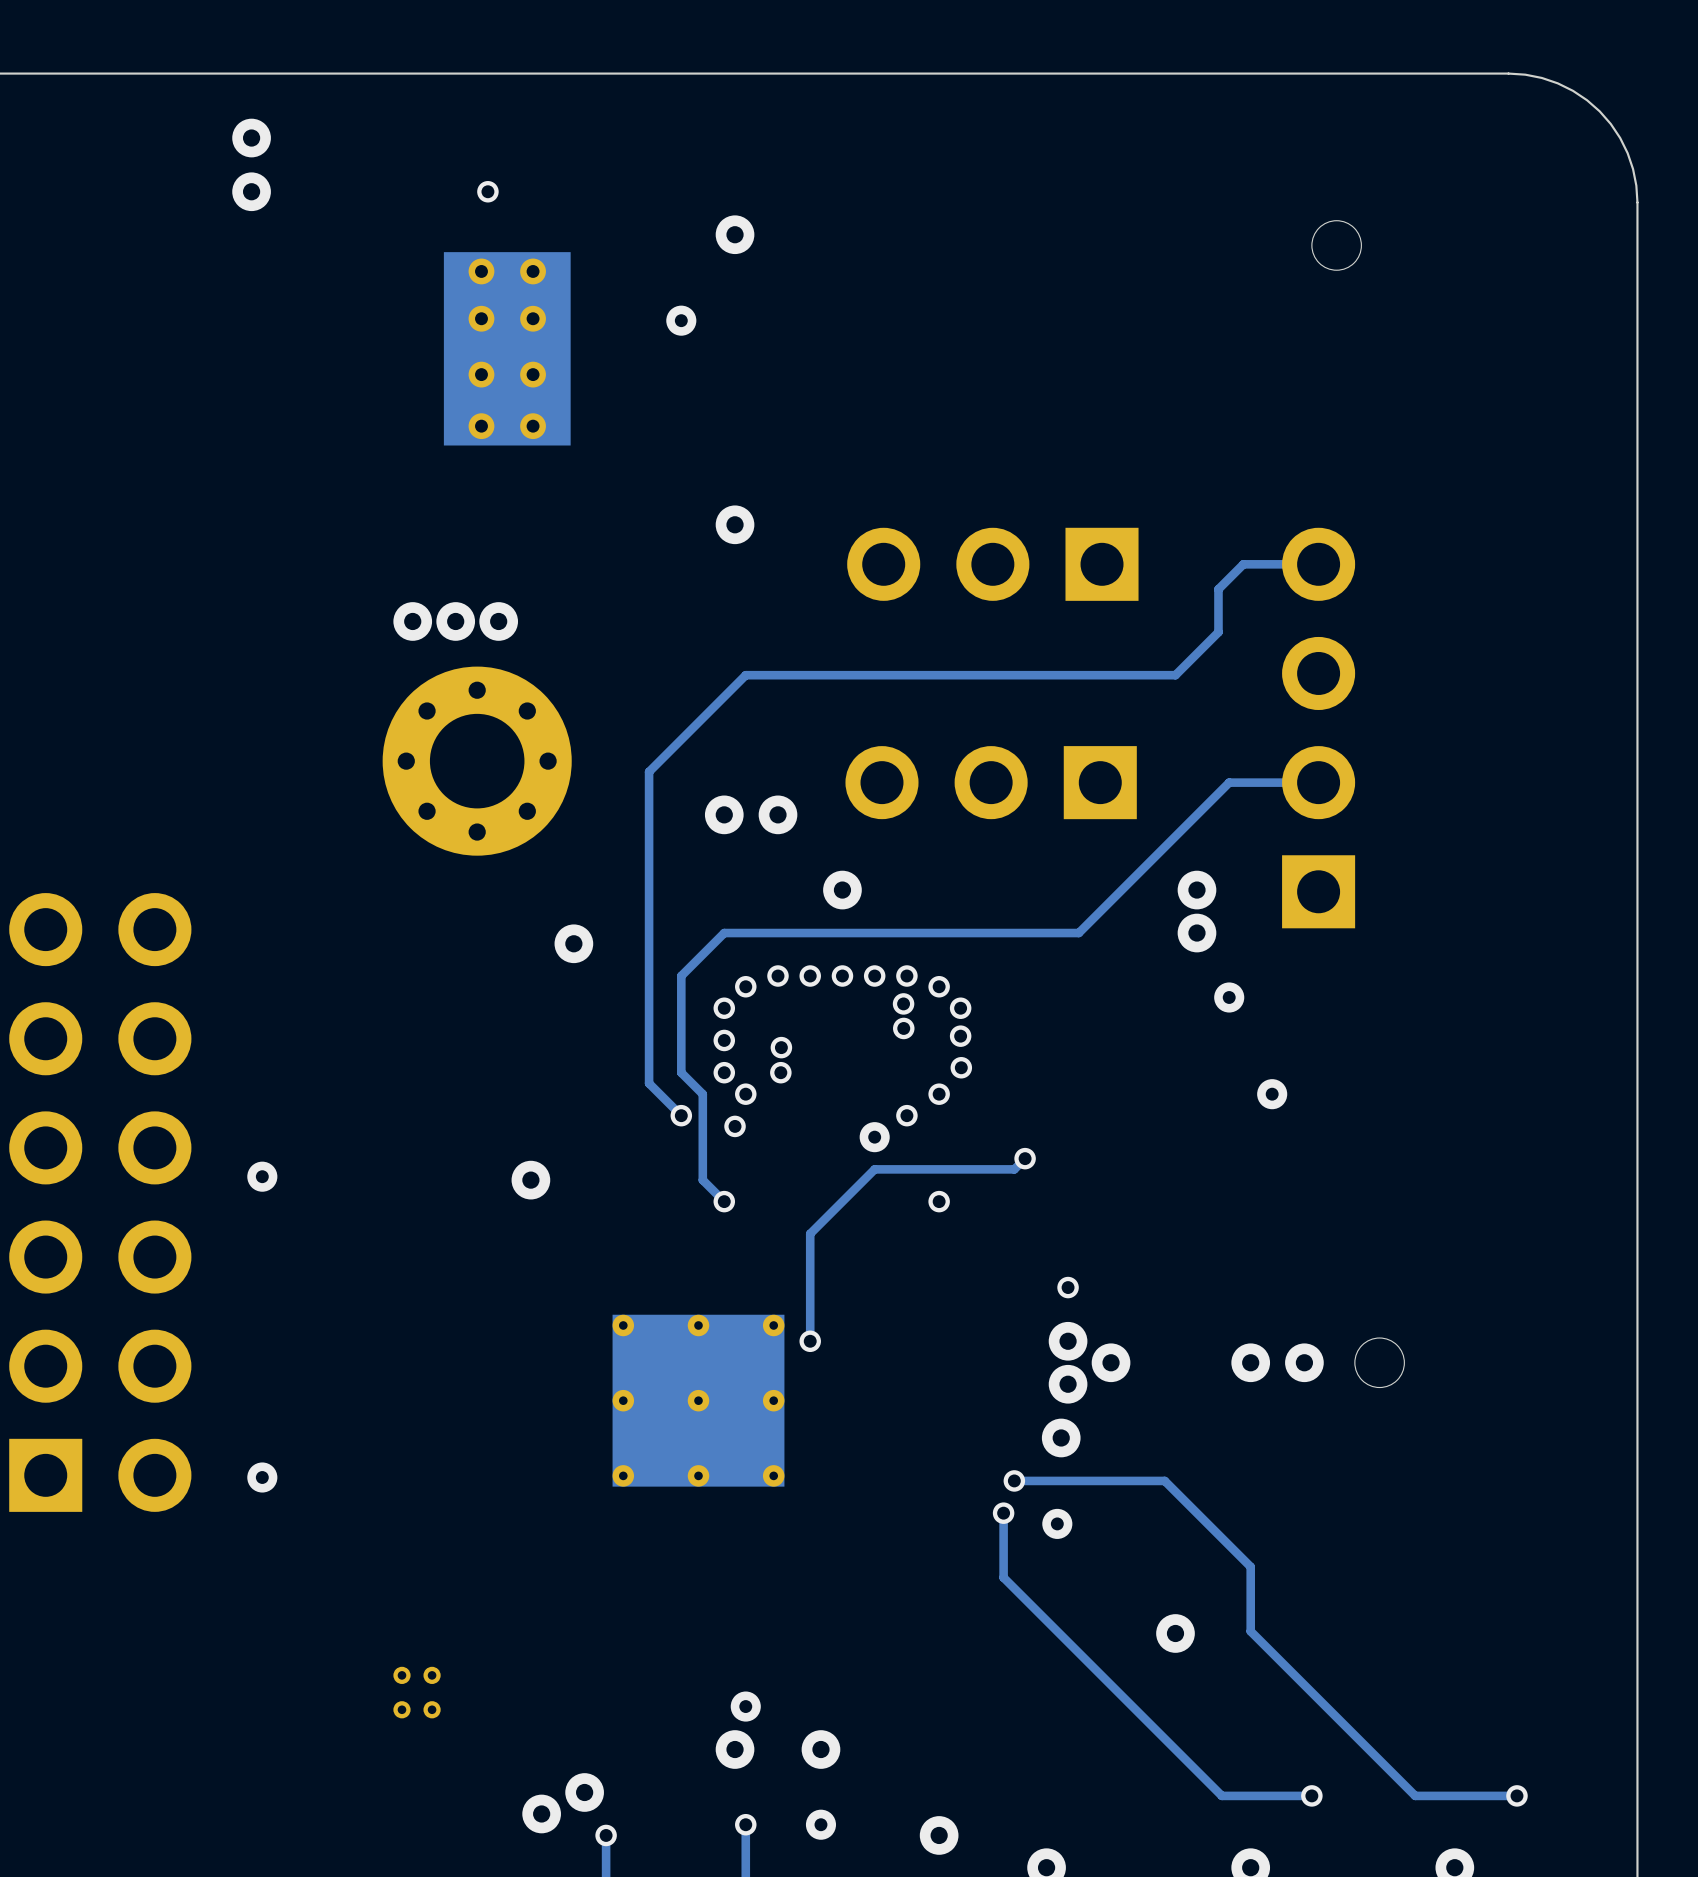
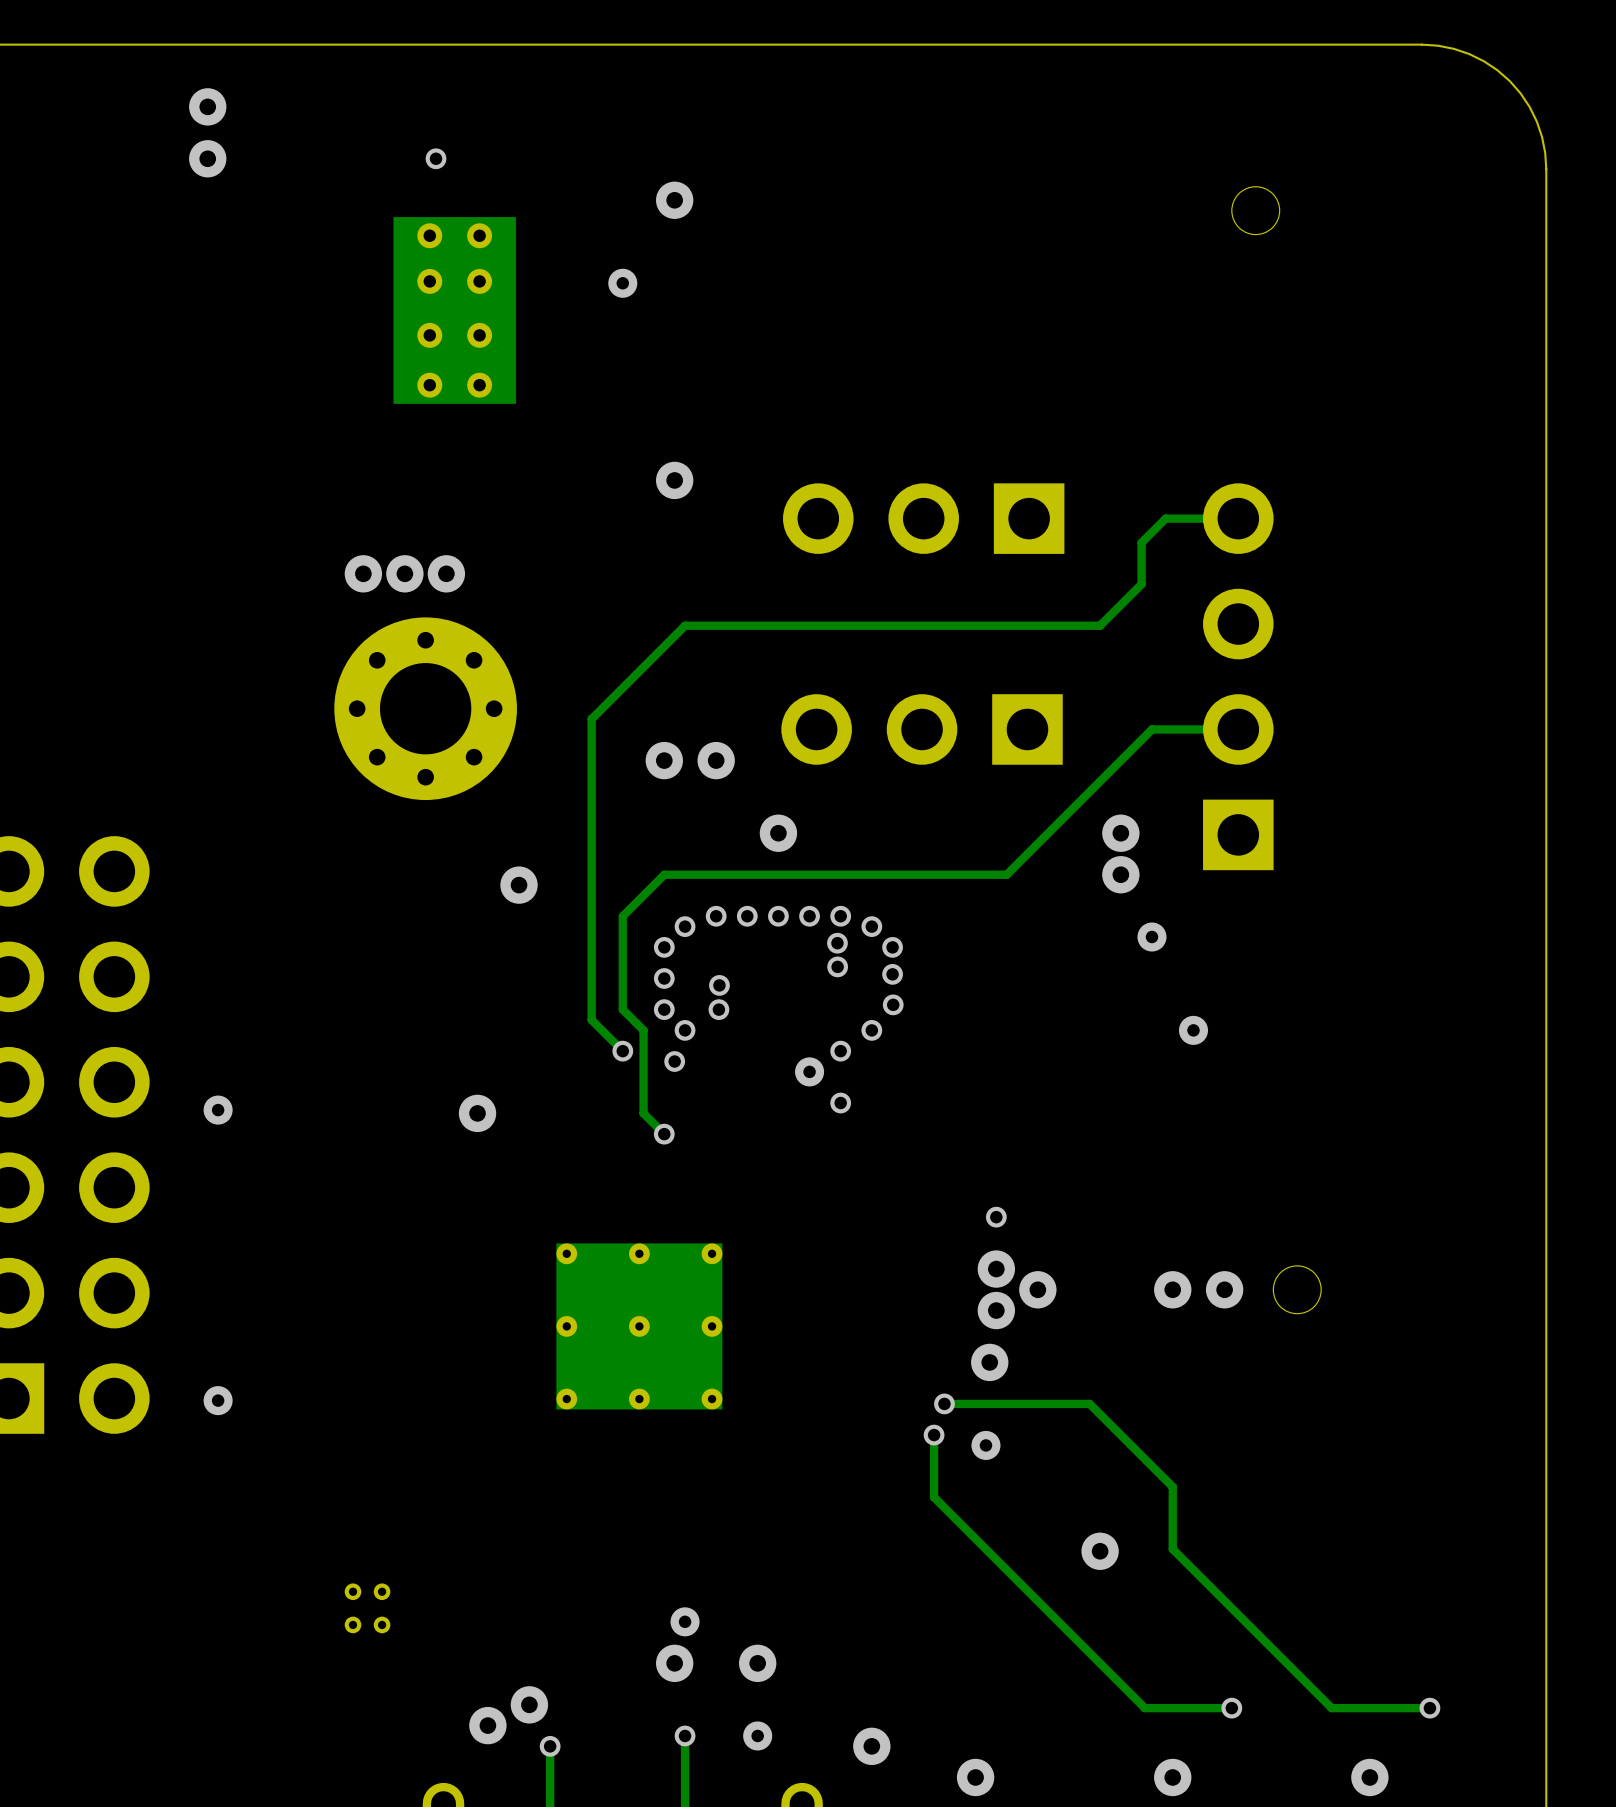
track: (1025, 1158) (1014, 1169) (874, 1169) (810, 1233) (810, 1341) -> none
via: (1025, 1158) -> none
via position: (939, 1201) -> (840, 1103)
via: (810, 1341) -> none

